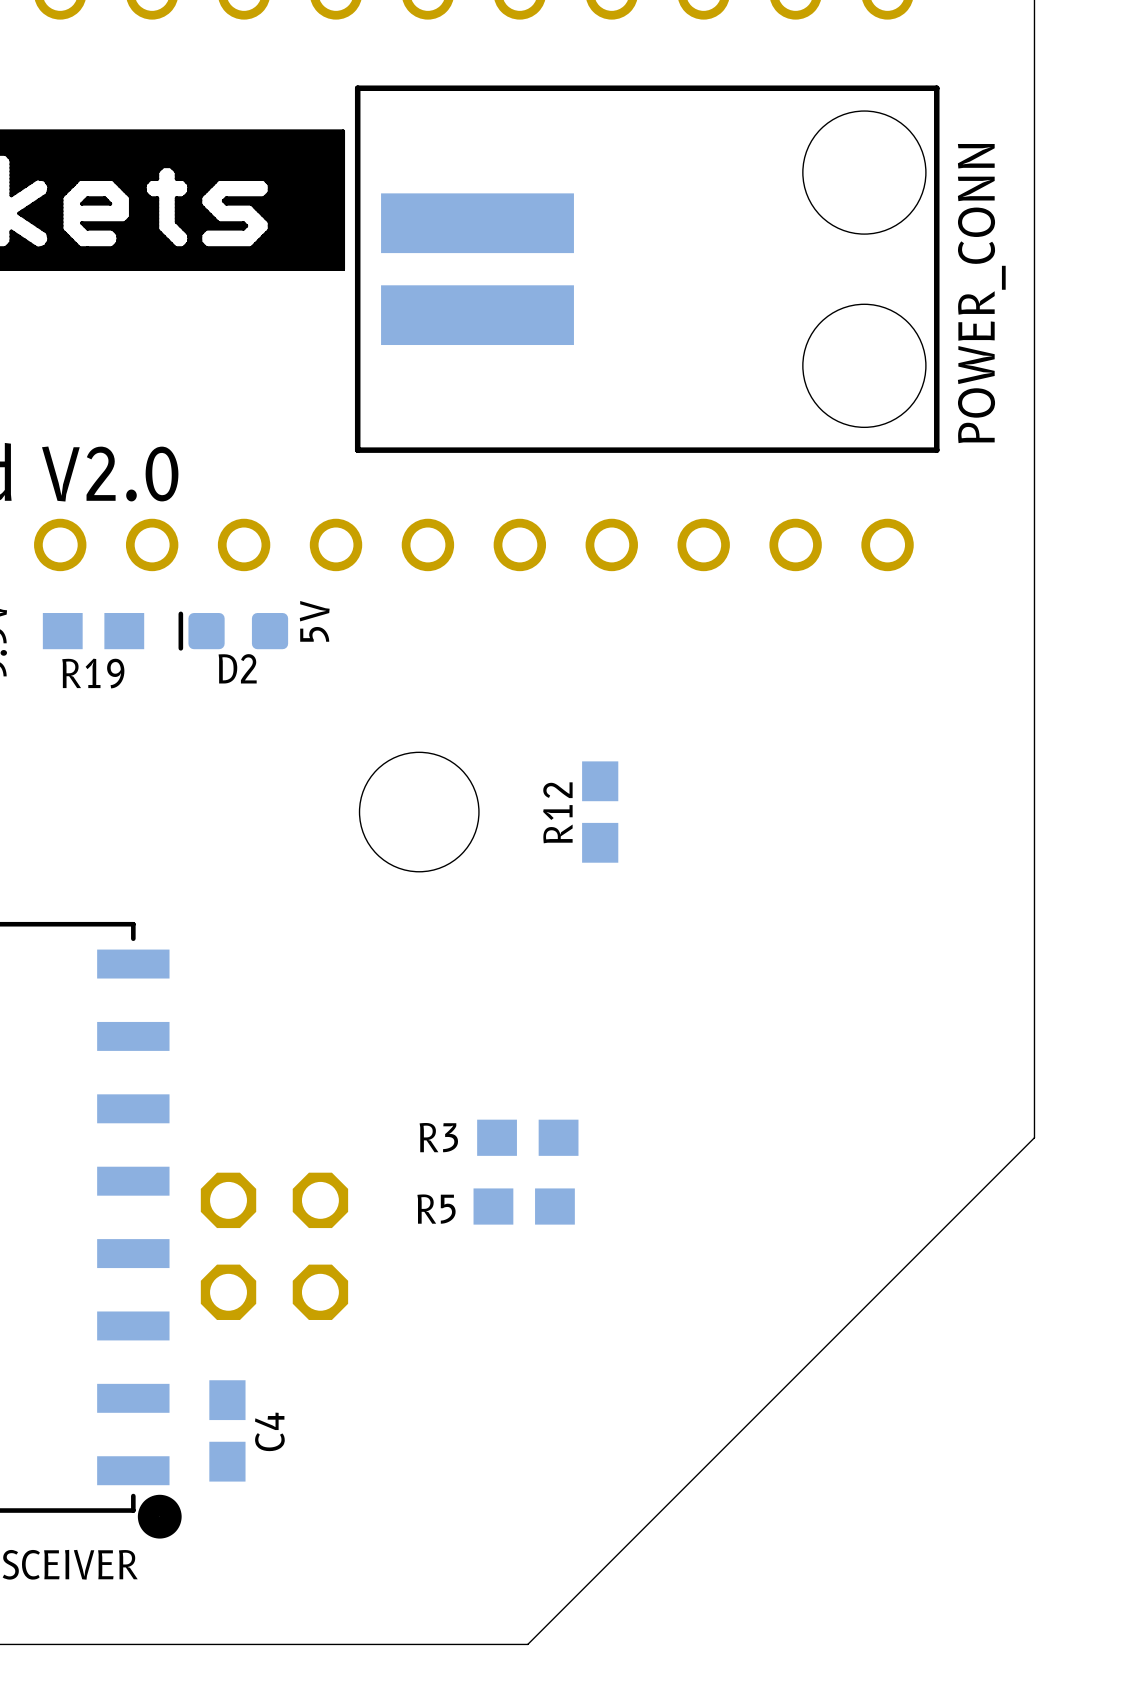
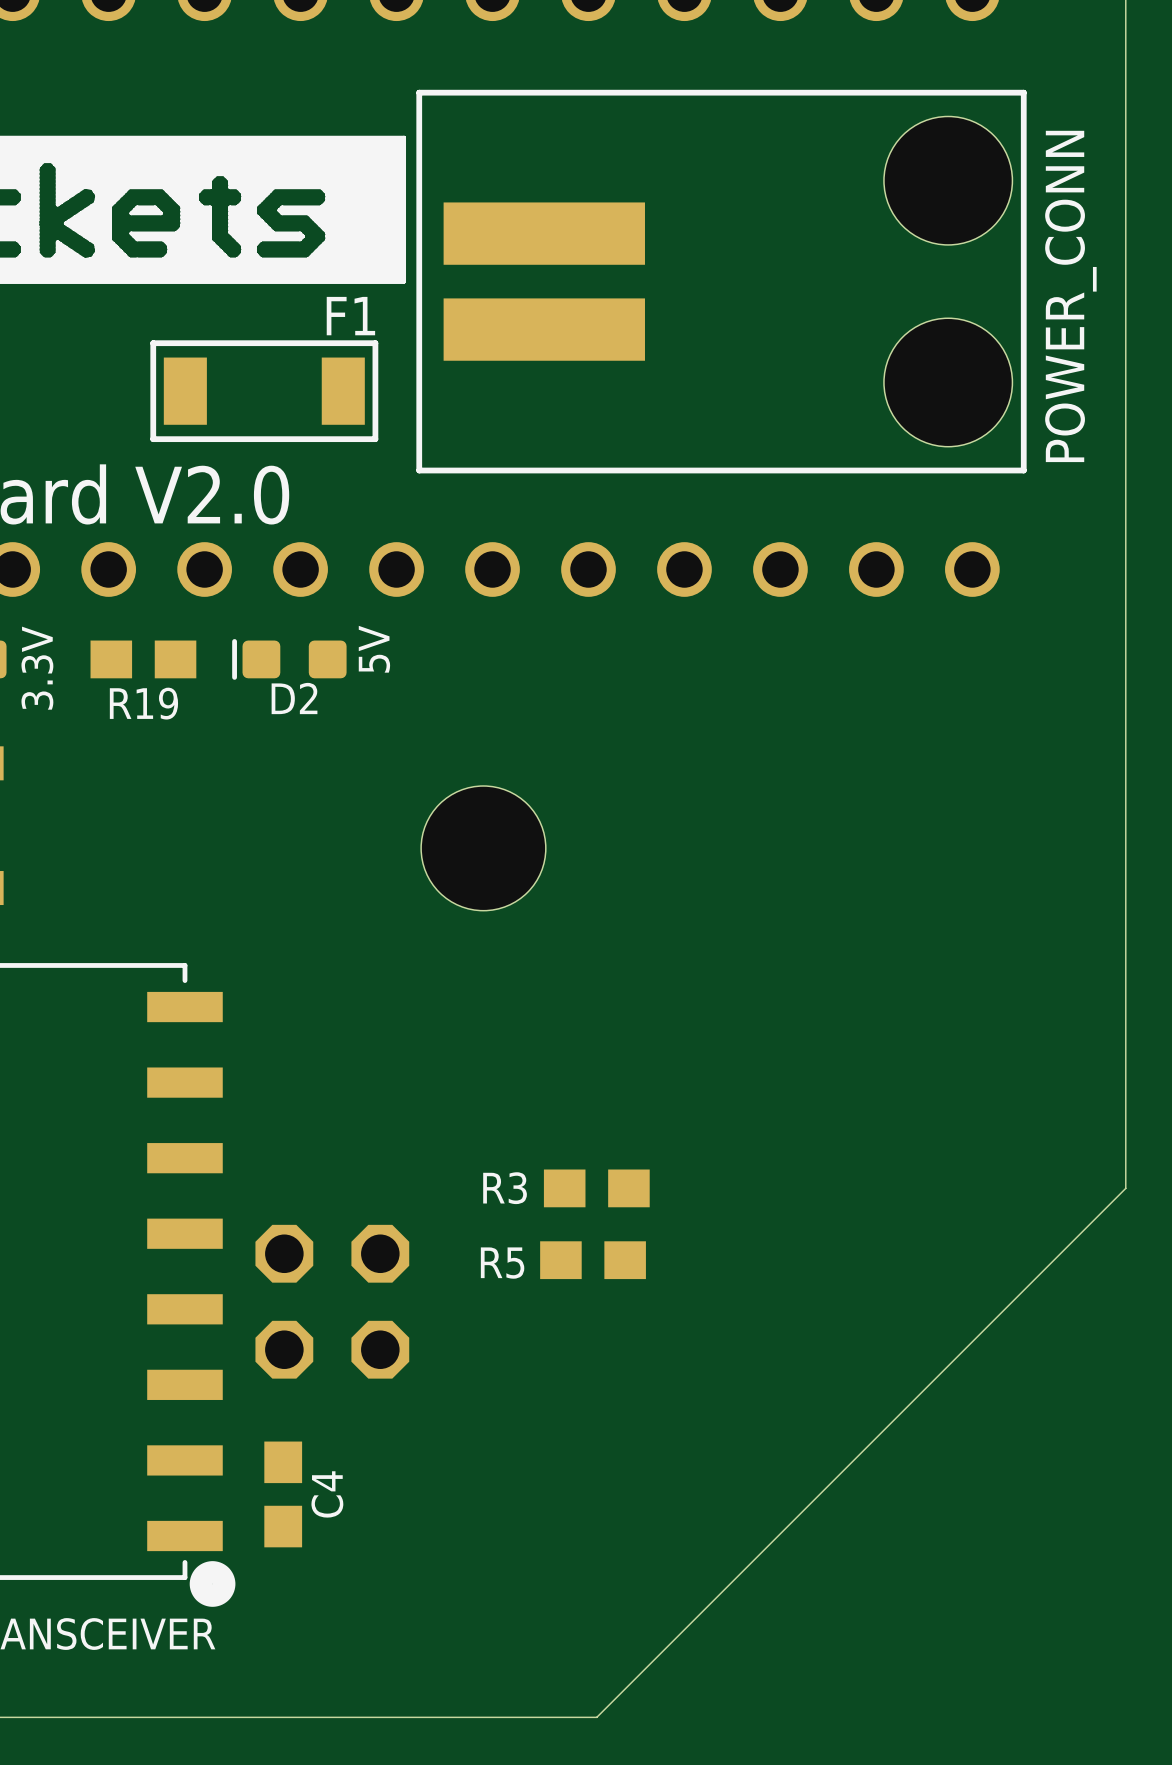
F1: none -> (264, 391)
R12: (600, 812) -> none

